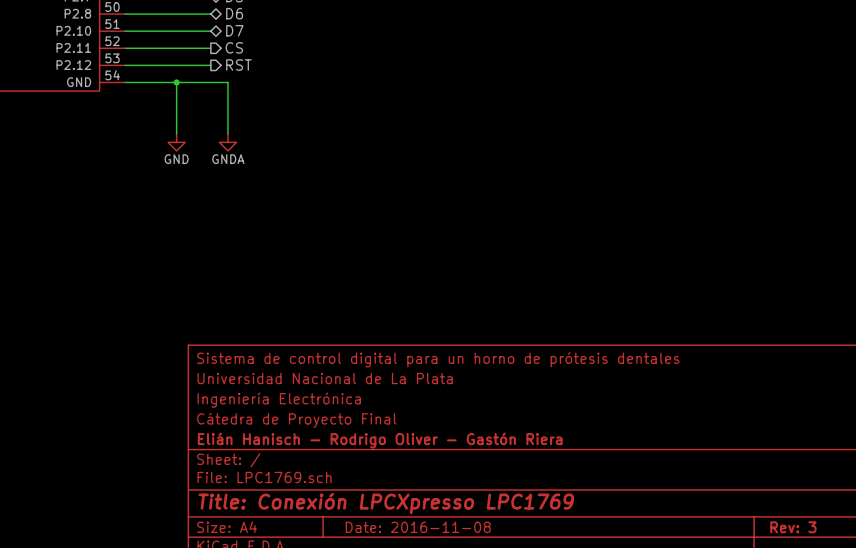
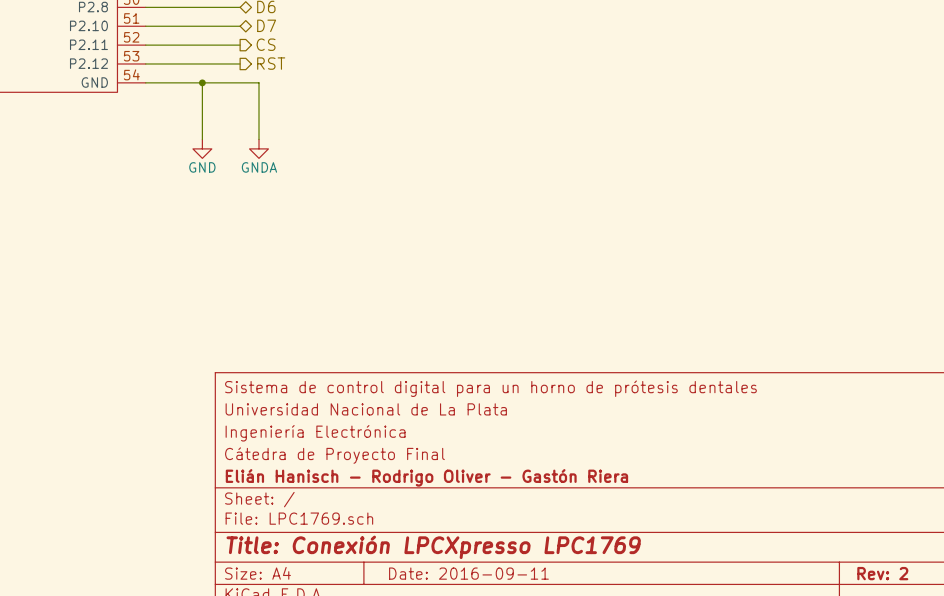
title block: Date: 2016-11-08 (418, 527) -> Date: 2016-09-11 (468, 573)
title block: Rev: 3 (793, 527) -> Rev: 2 (882, 573)

